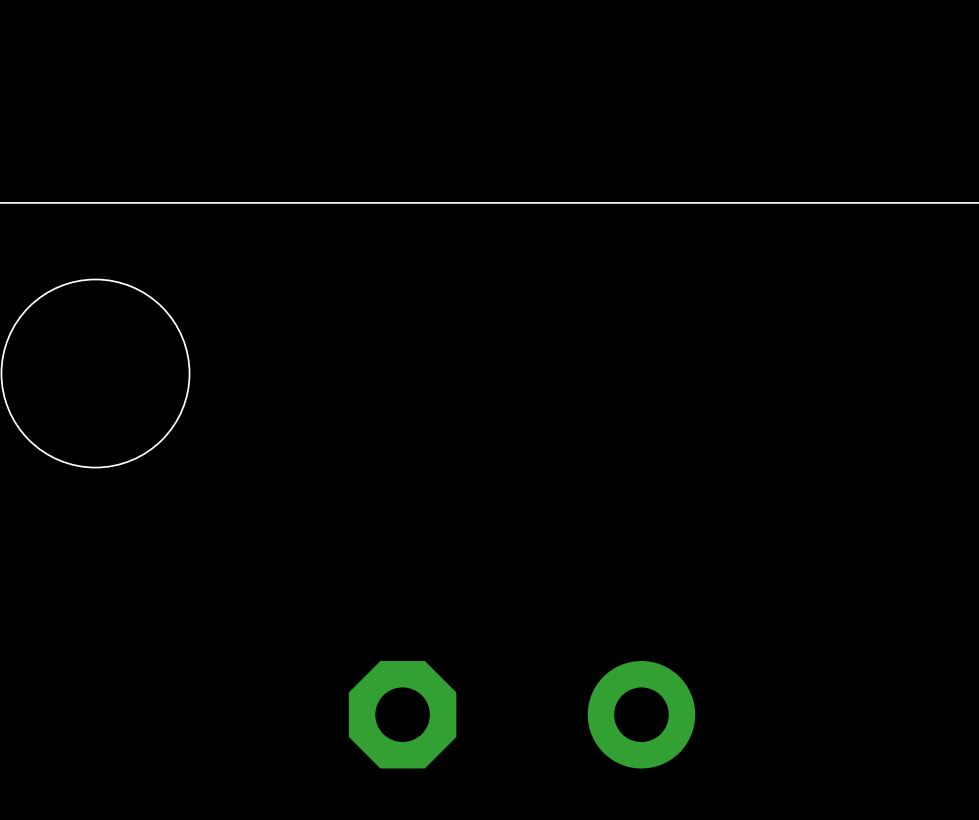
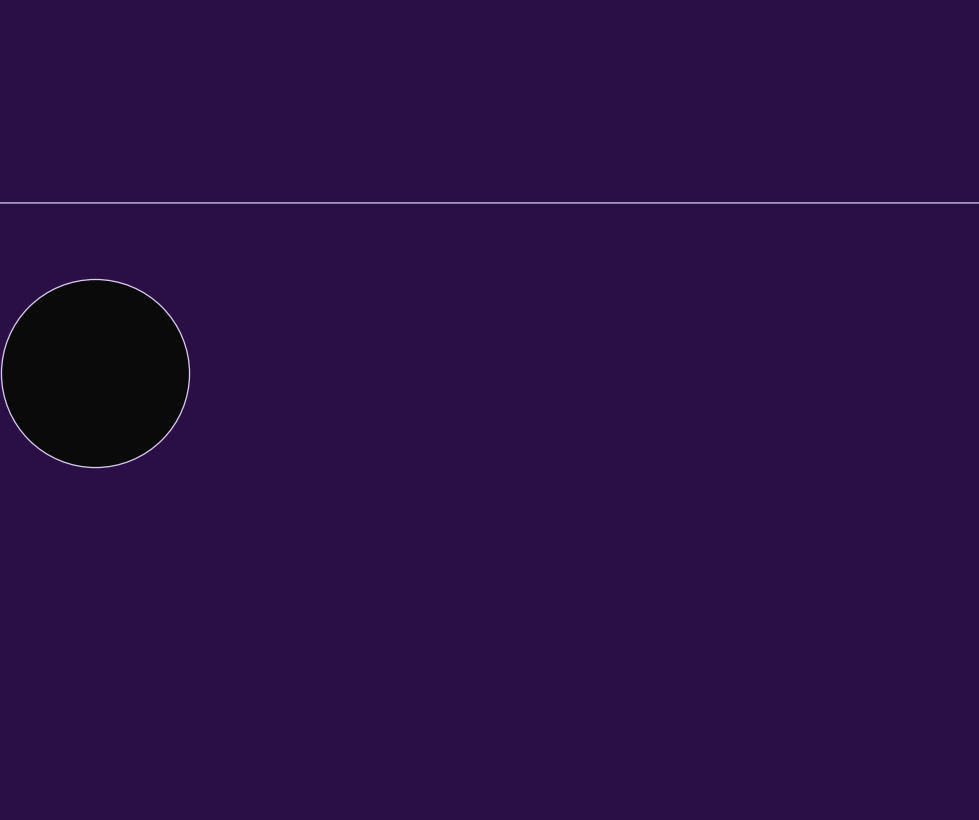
part: (522, 714) -> none

